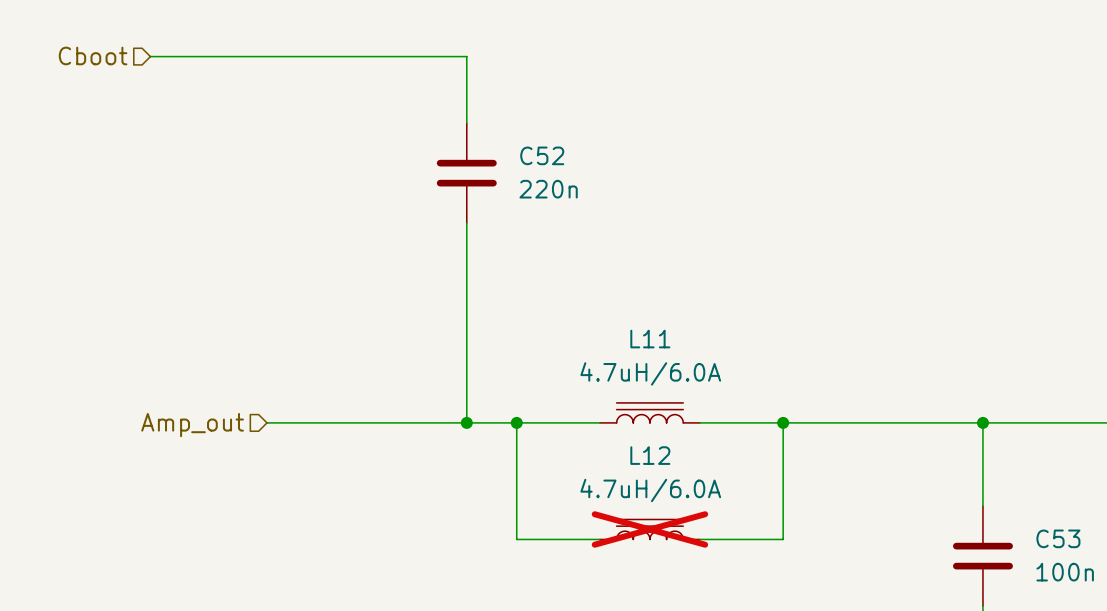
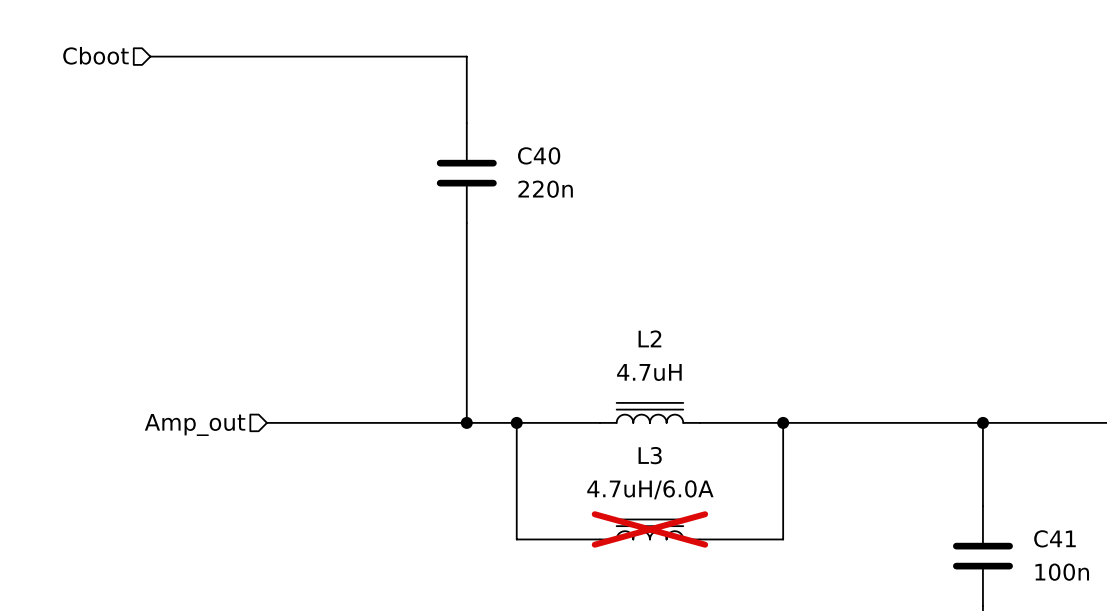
C52 name: C52 (542, 155) -> C40 (539, 155)
L11 name: L11 (650, 339) -> L2 (649, 338)
L11 value: 4.7uH/6.0A (650, 373) -> 4.7uH (649, 372)
L12 name: L12 (650, 455) -> L3 (650, 455)
C53 name: C53 (1058, 538) -> C41 (1055, 538)

